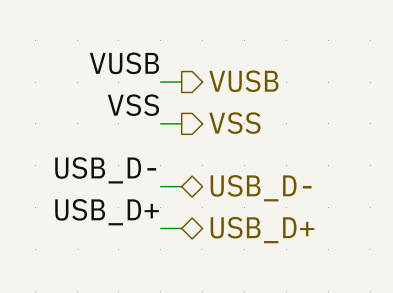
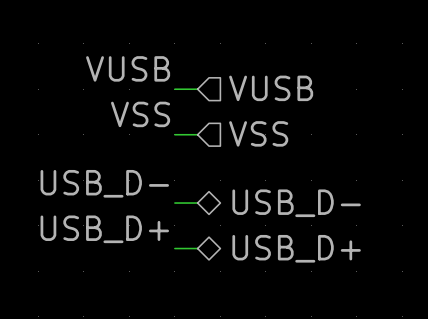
hierarchical label shape: output (243, 81) -> input (271, 88)
hierarchical label shape: output (234, 123) -> input (258, 133)

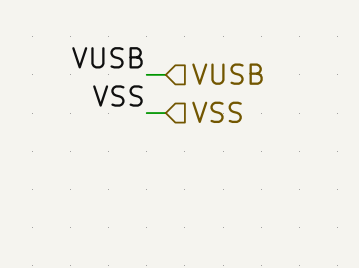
label: USB_D- (104, 183) -> none
wire: (174, 203) (197, 203) -> none
hierarchical label: USB_D- (296, 203) -> none
label: USB_D+ (104, 229) -> none
wire: (174, 248) (197, 248) -> none
hierarchical label: USB_D+ (296, 248) -> none

